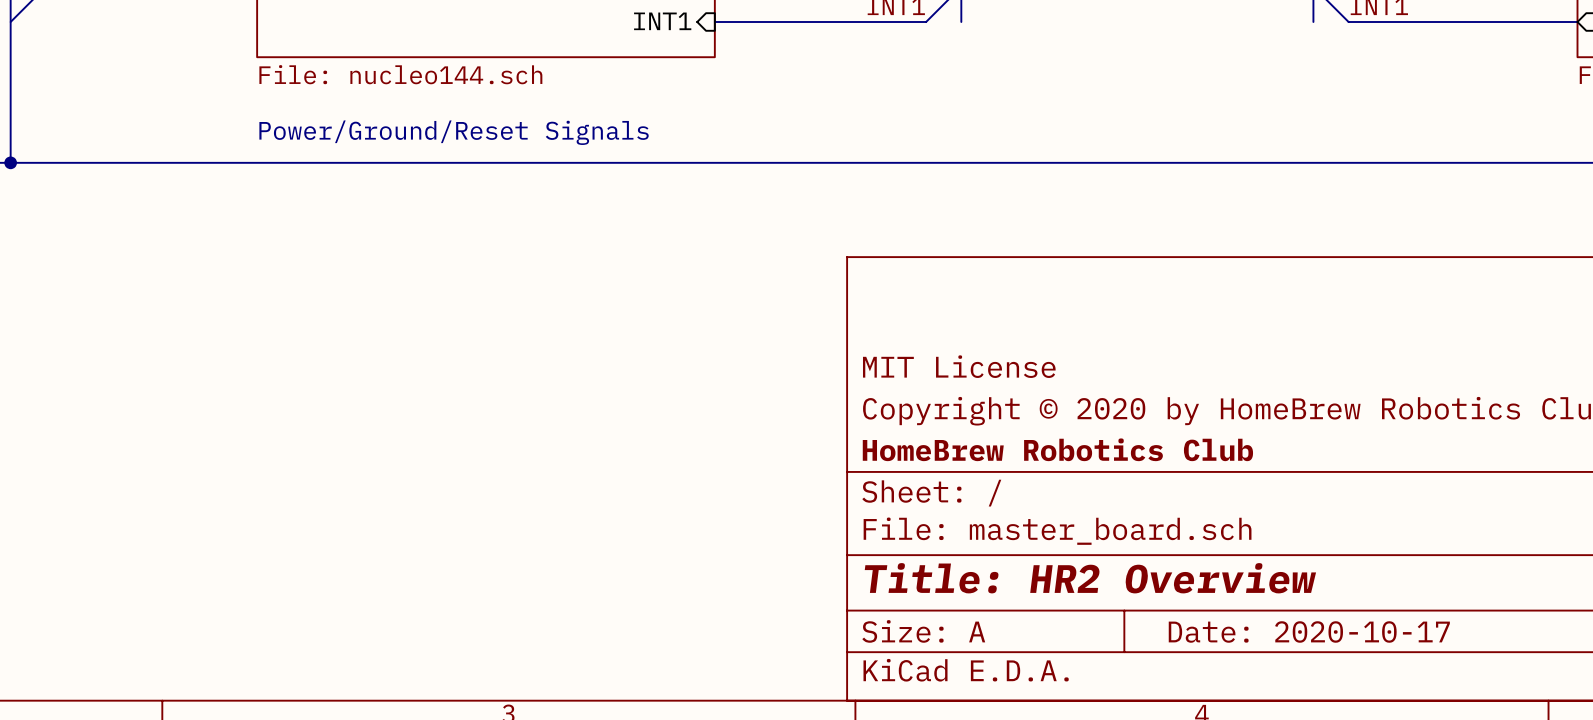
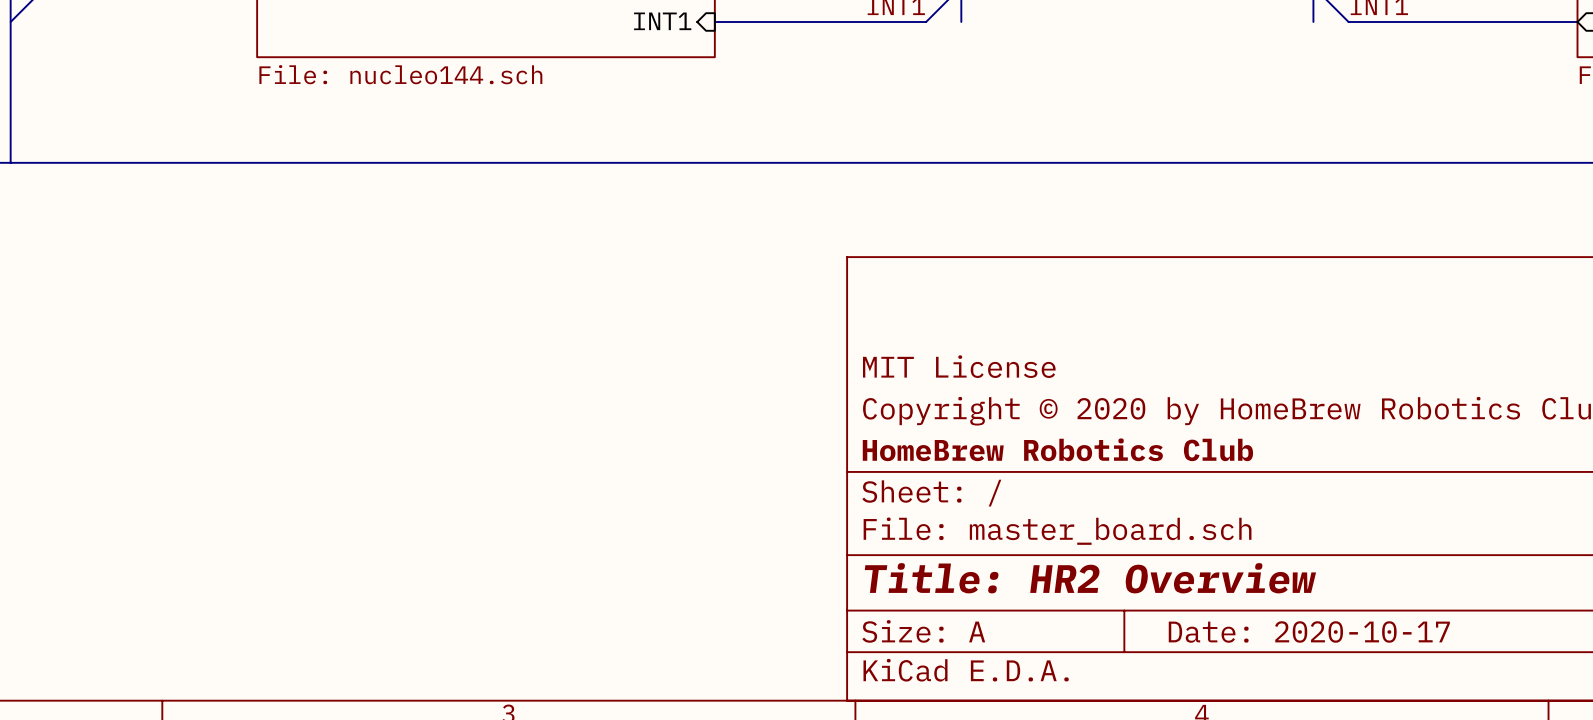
text: Power/Ground/Reset Signals (454, 132) -> none
junction: (10, 162) -> none

